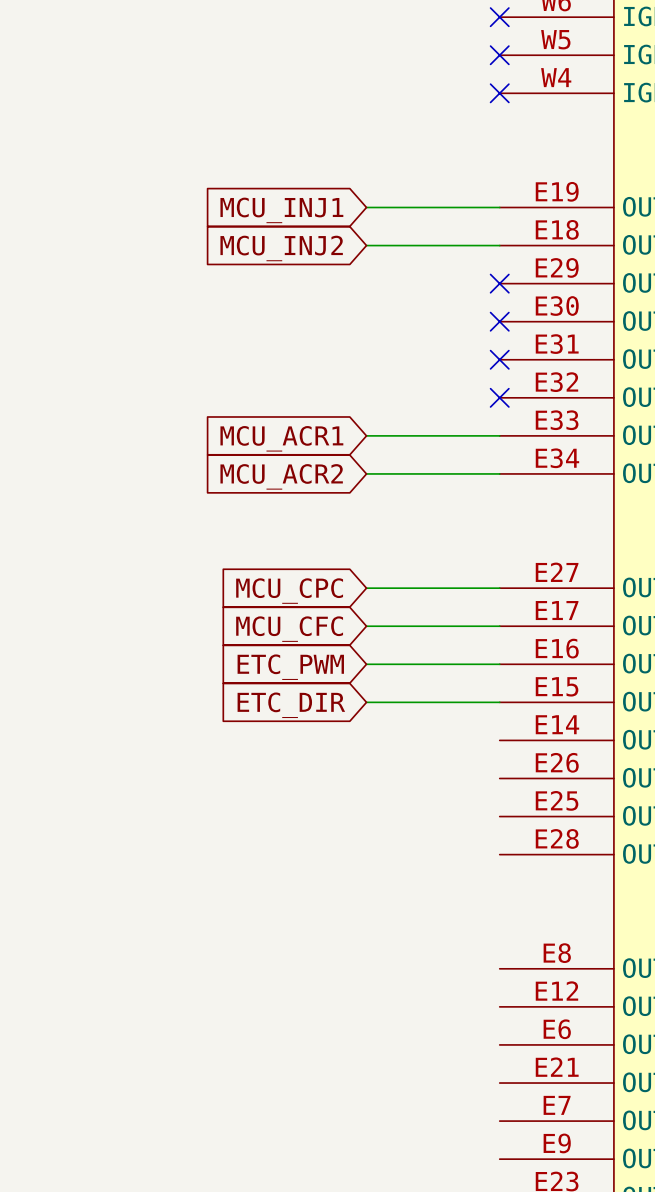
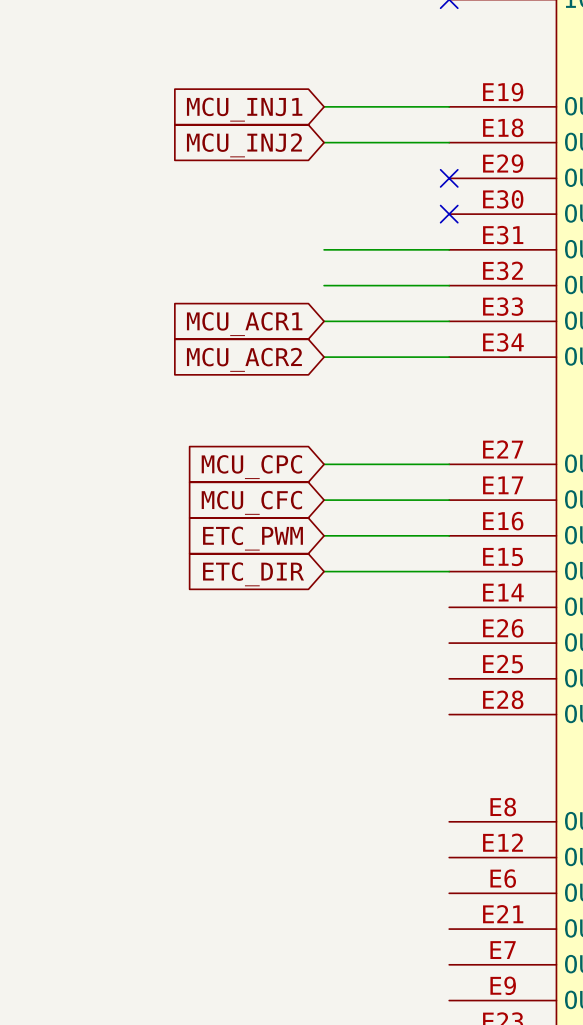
wire: none -> (324, 249) (449, 249)
no-connect mark: (499, 359) -> none
wire: none -> (324, 285) (449, 285)
no-connect mark: (499, 397) -> none

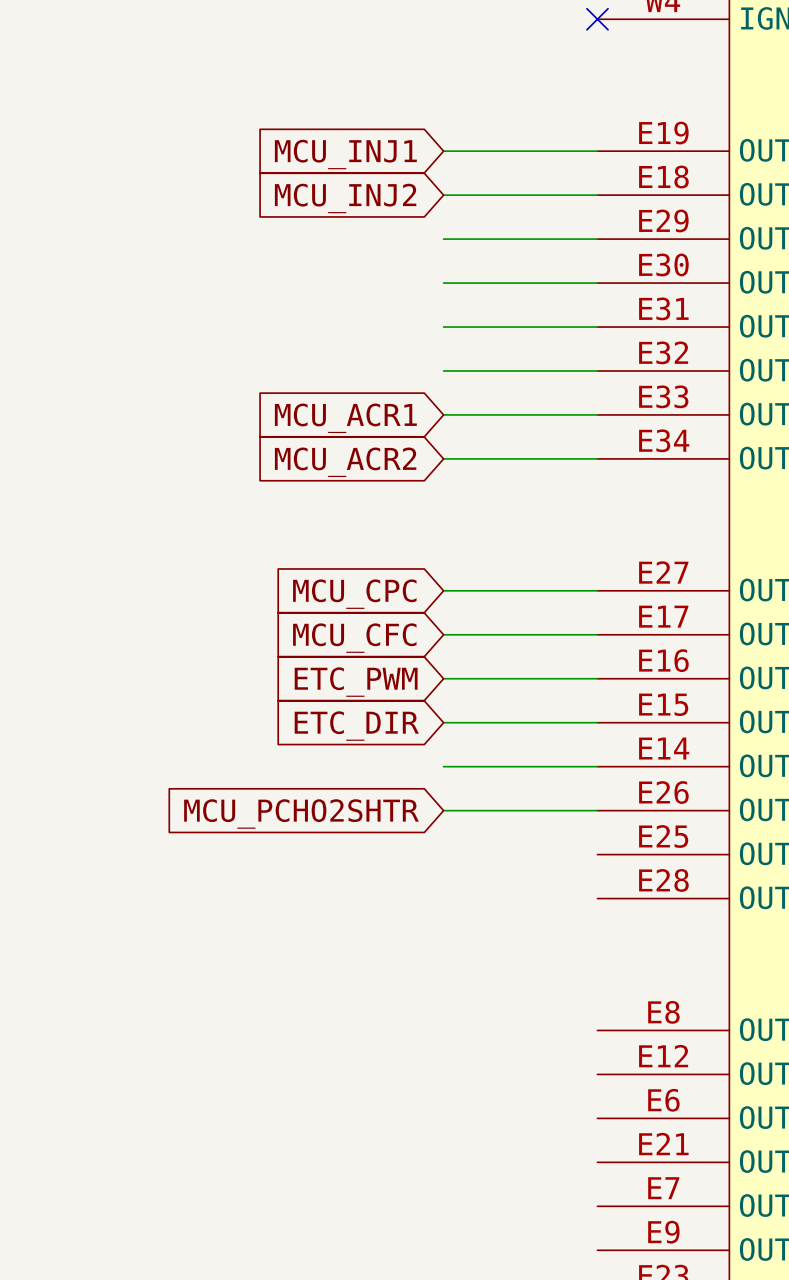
wire: none -> (443, 239) (597, 239)
no-connect mark: (449, 178) -> none
wire: none -> (443, 283) (597, 283)
no-connect mark: (449, 214) -> none
wire: none -> (443, 766) (597, 766)
wire: none -> (443, 810) (597, 810)
global label: none -> MCU_PCHO2SHTR (301, 814)

